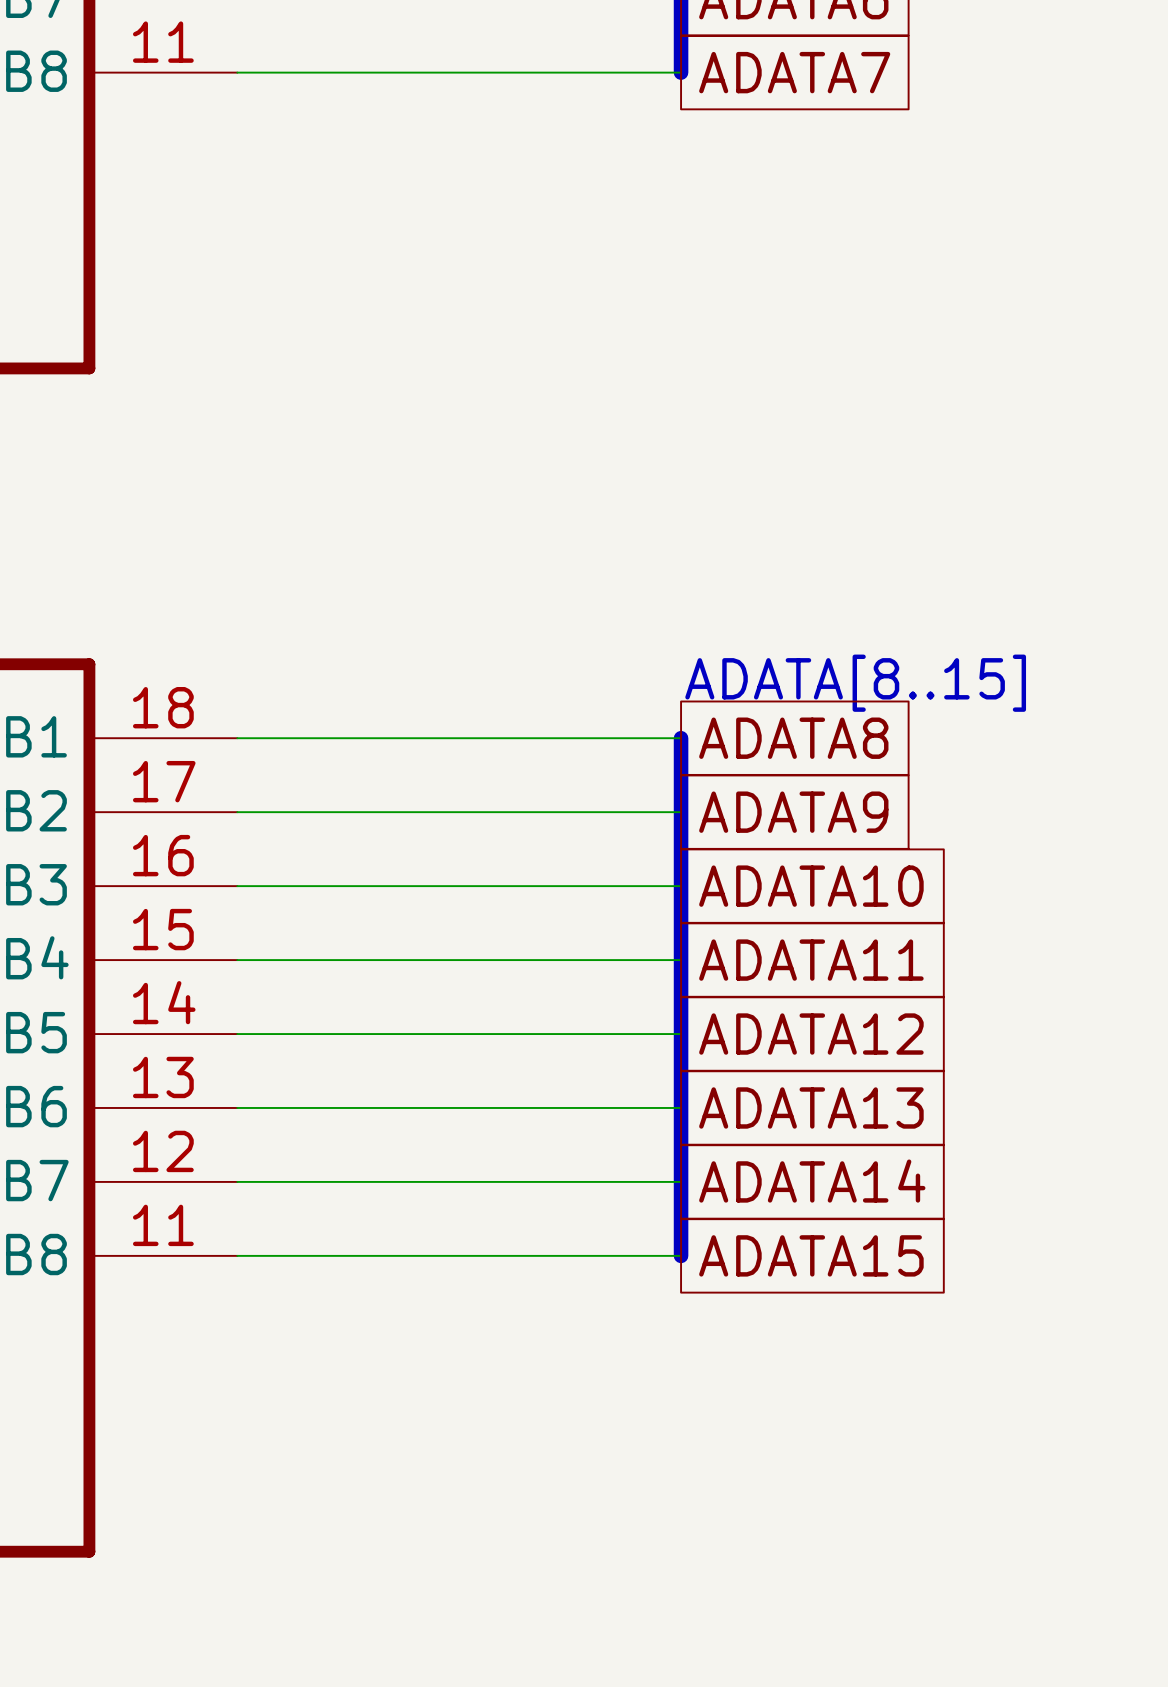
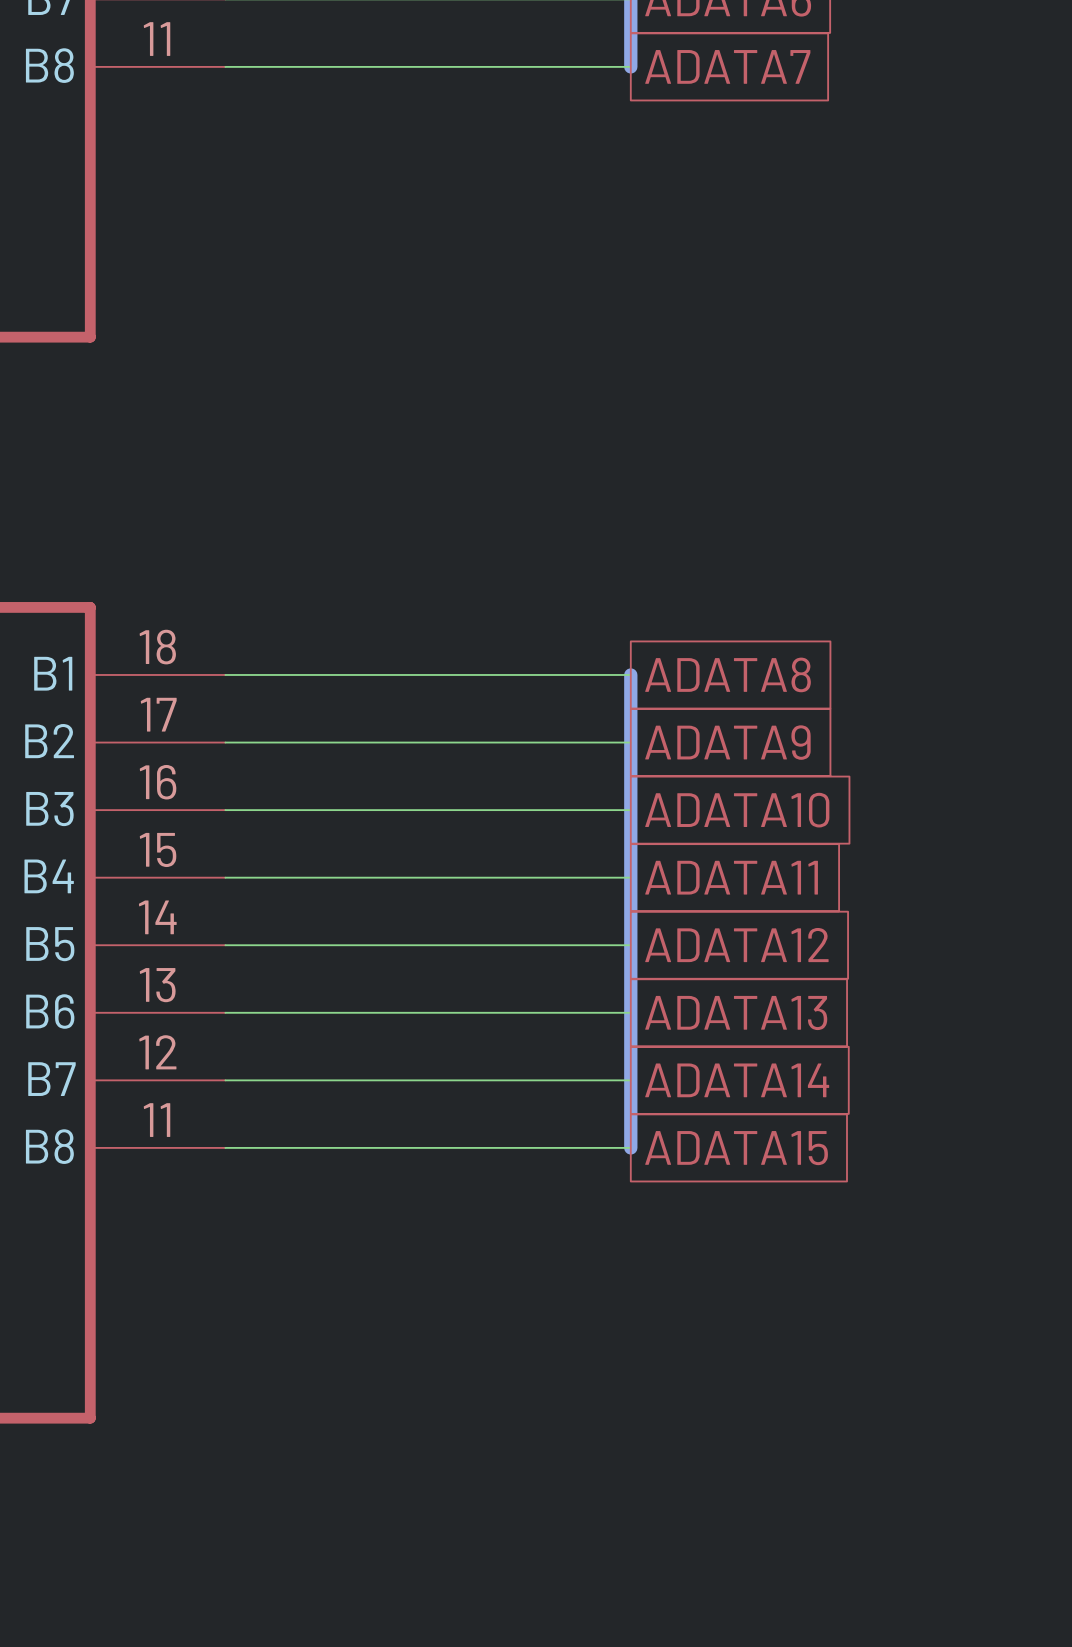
text: ADATA[8..15] (855, 683) -> none

